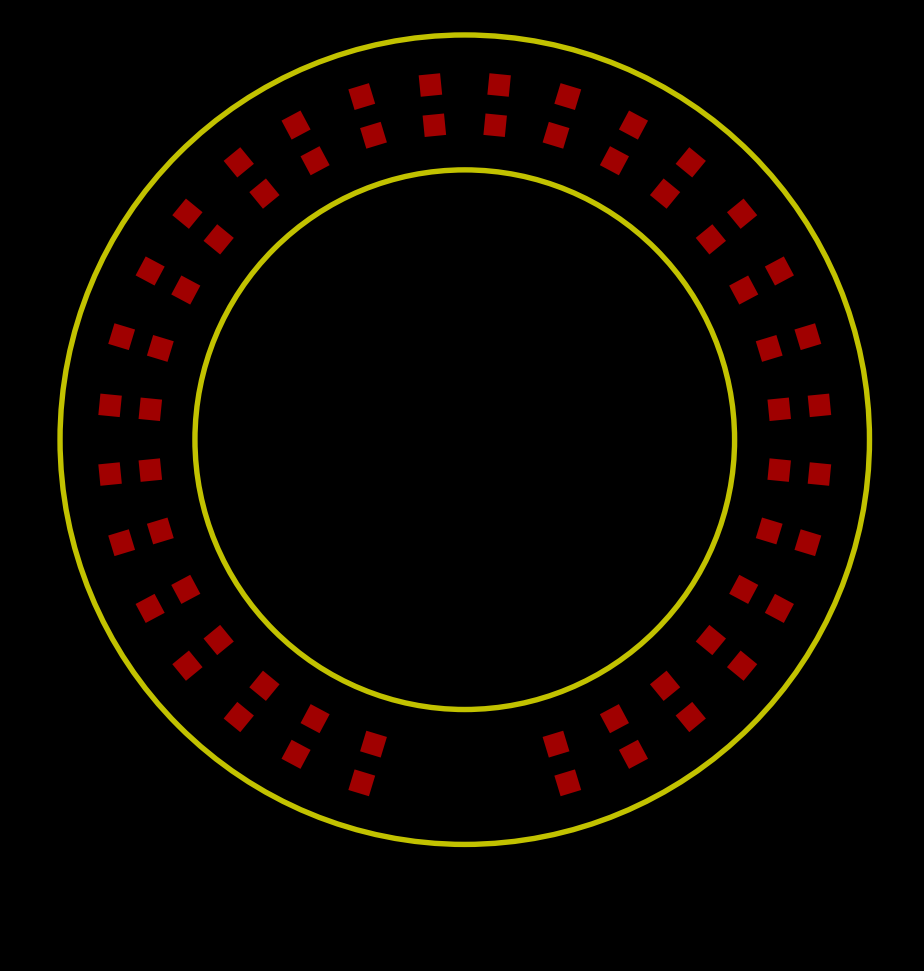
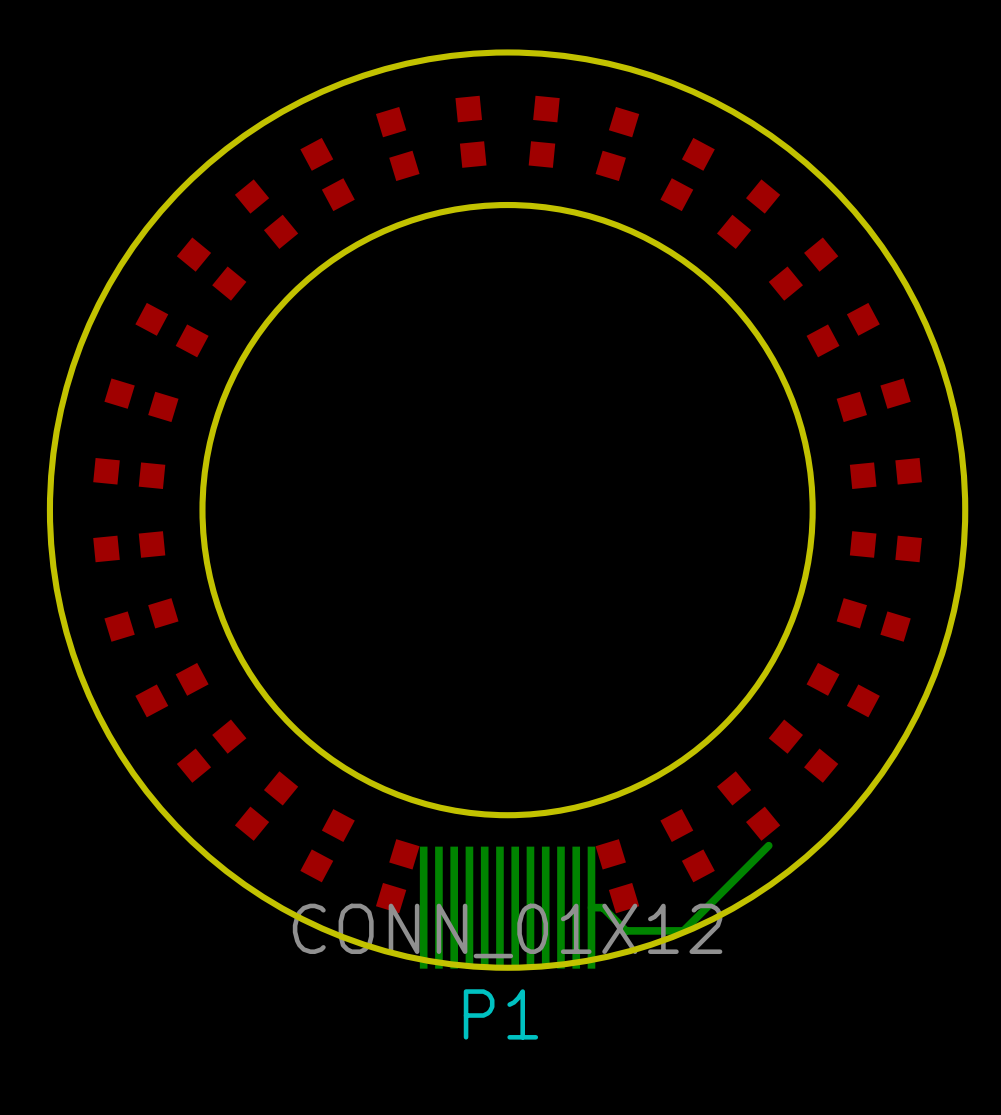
bottom track: none -> (768, 845) (683, 930) (626, 930) (602, 907) (591, 907)
P1: none -> CONN_01X12 (507, 907)

